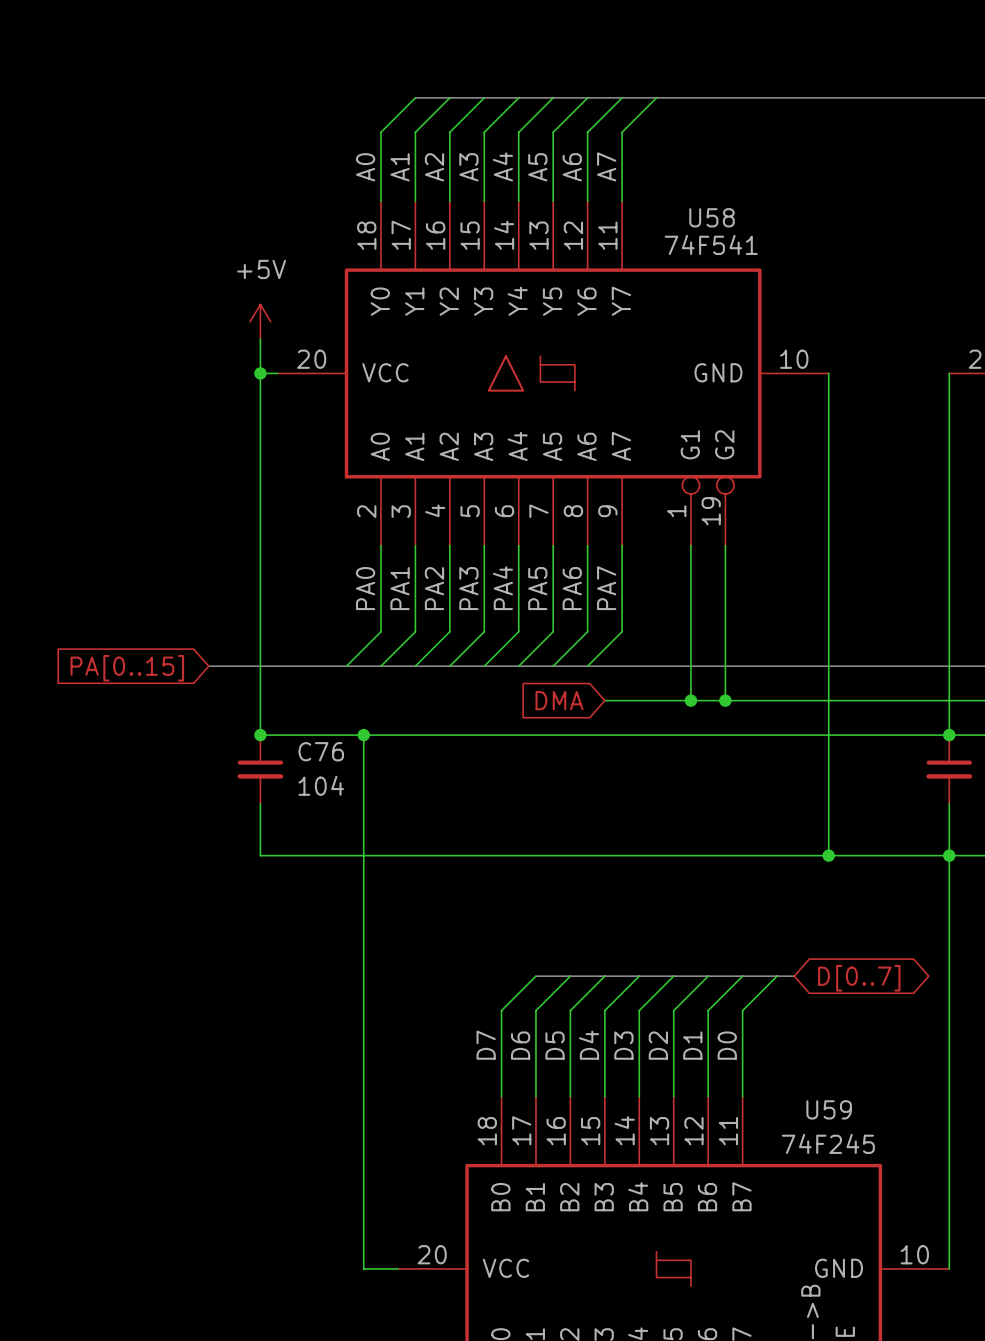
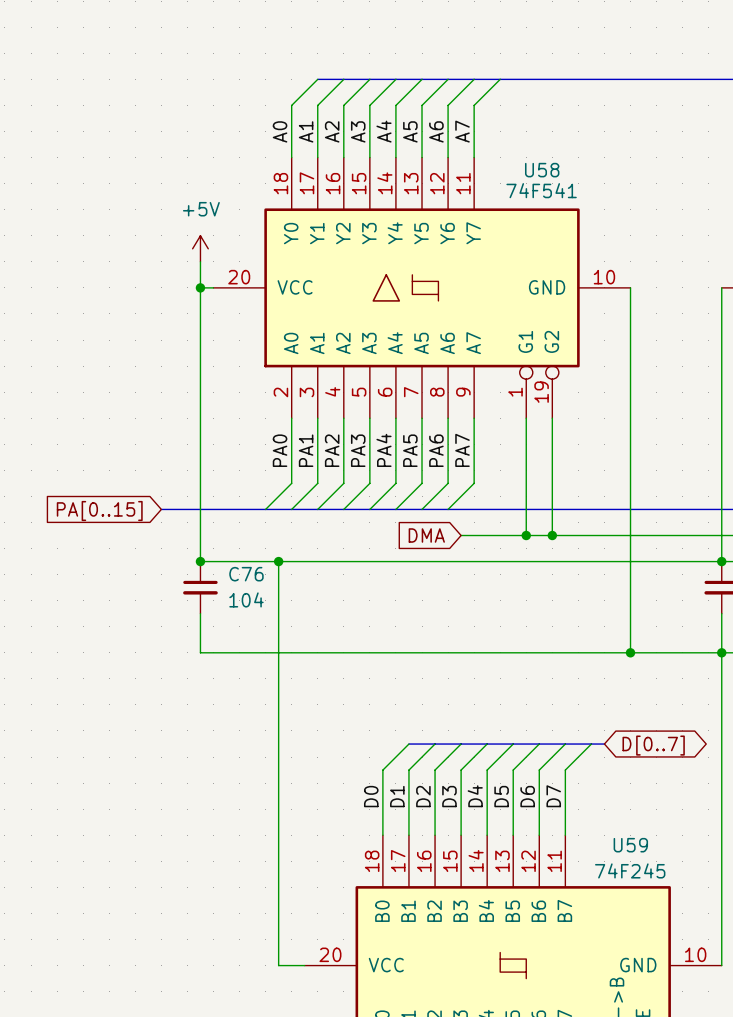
label: D7 (486, 1045) -> D0 (371, 796)
label: D6 (520, 1045) -> D1 (397, 796)
label: D5 (555, 1045) -> D2 (423, 796)
label: D4 (589, 1045) -> D3 (449, 796)
label: D3 (623, 1045) -> D4 (475, 796)
label: D2 (658, 1045) -> D5 (501, 796)
label: D1 (692, 1045) -> D6 (527, 796)
label: D0 (727, 1045) -> D7 (553, 796)

